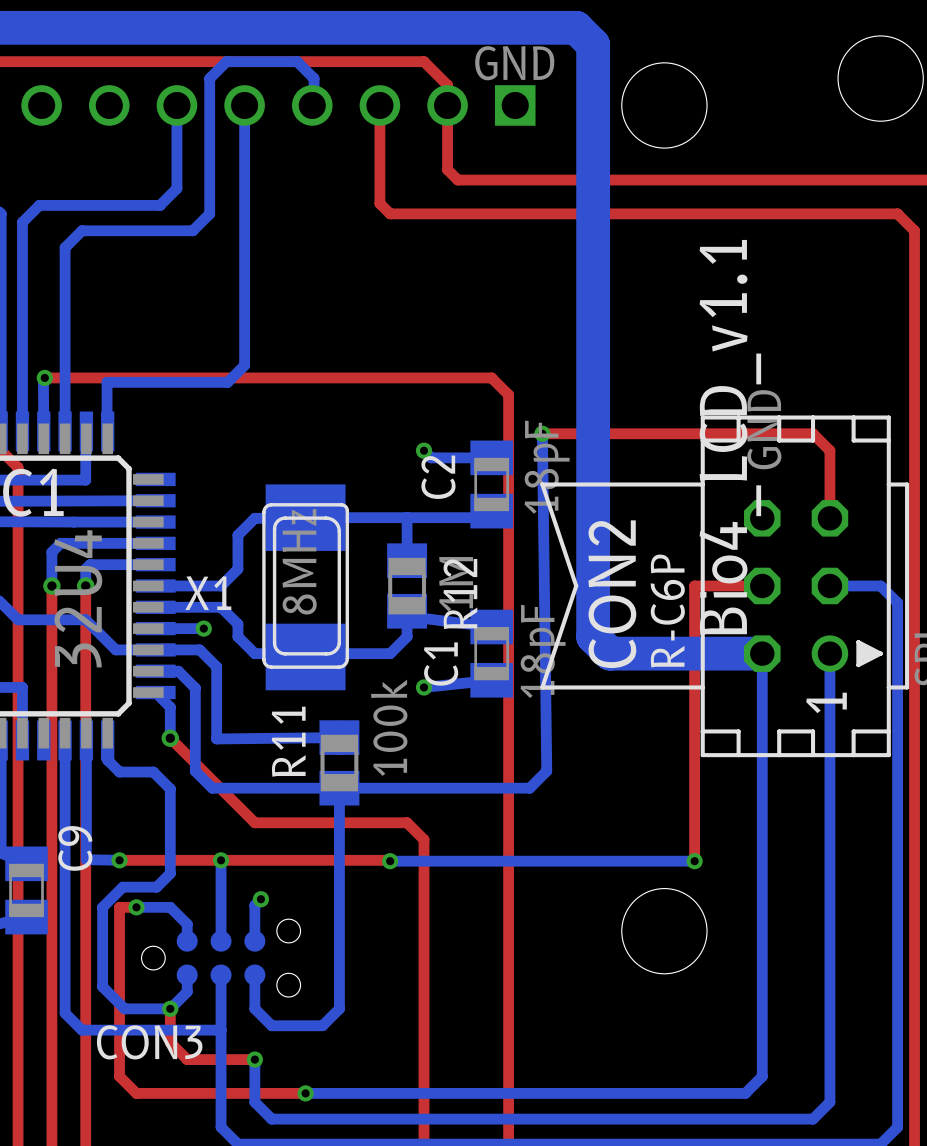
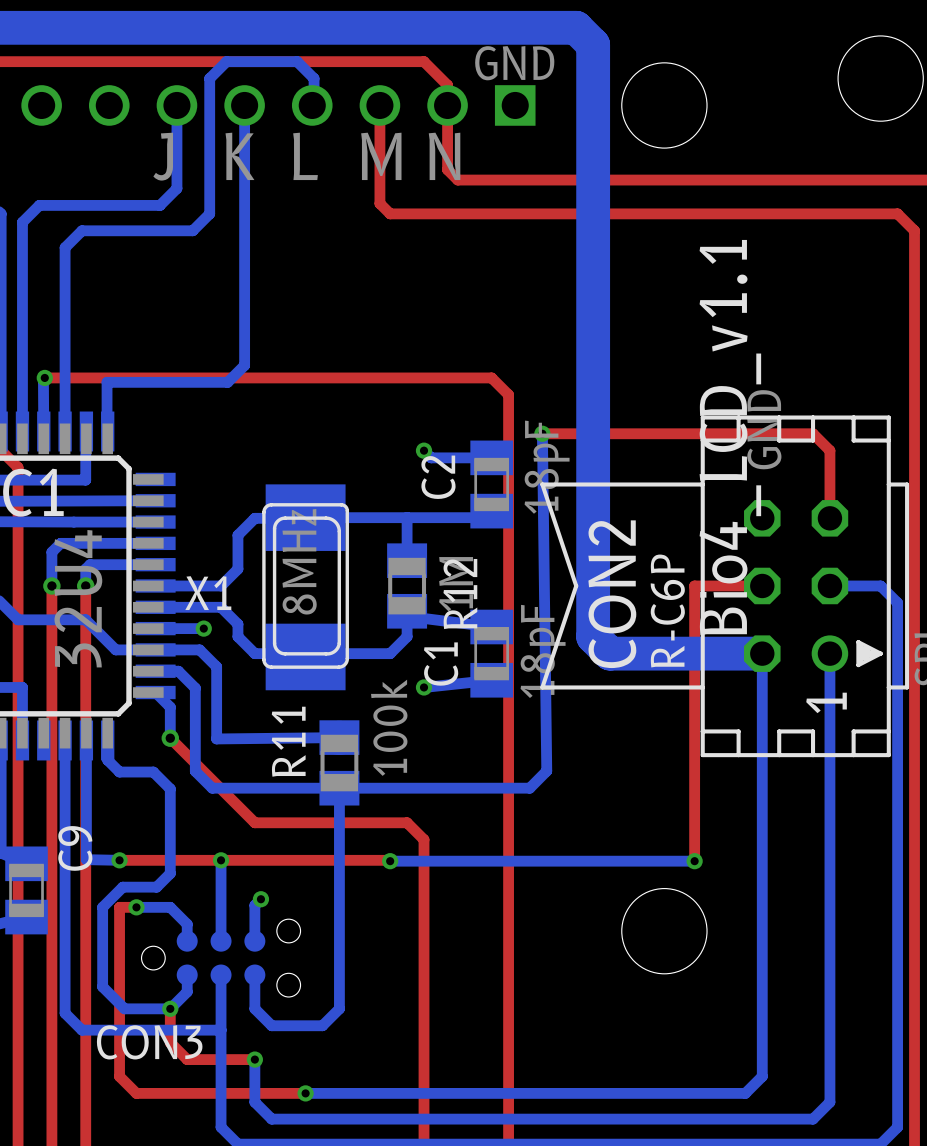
text: none -> J (163, 156)
text: none -> K (239, 156)
text: none -> L (305, 156)
text: none -> M (381, 156)
text: none -> N (444, 156)

